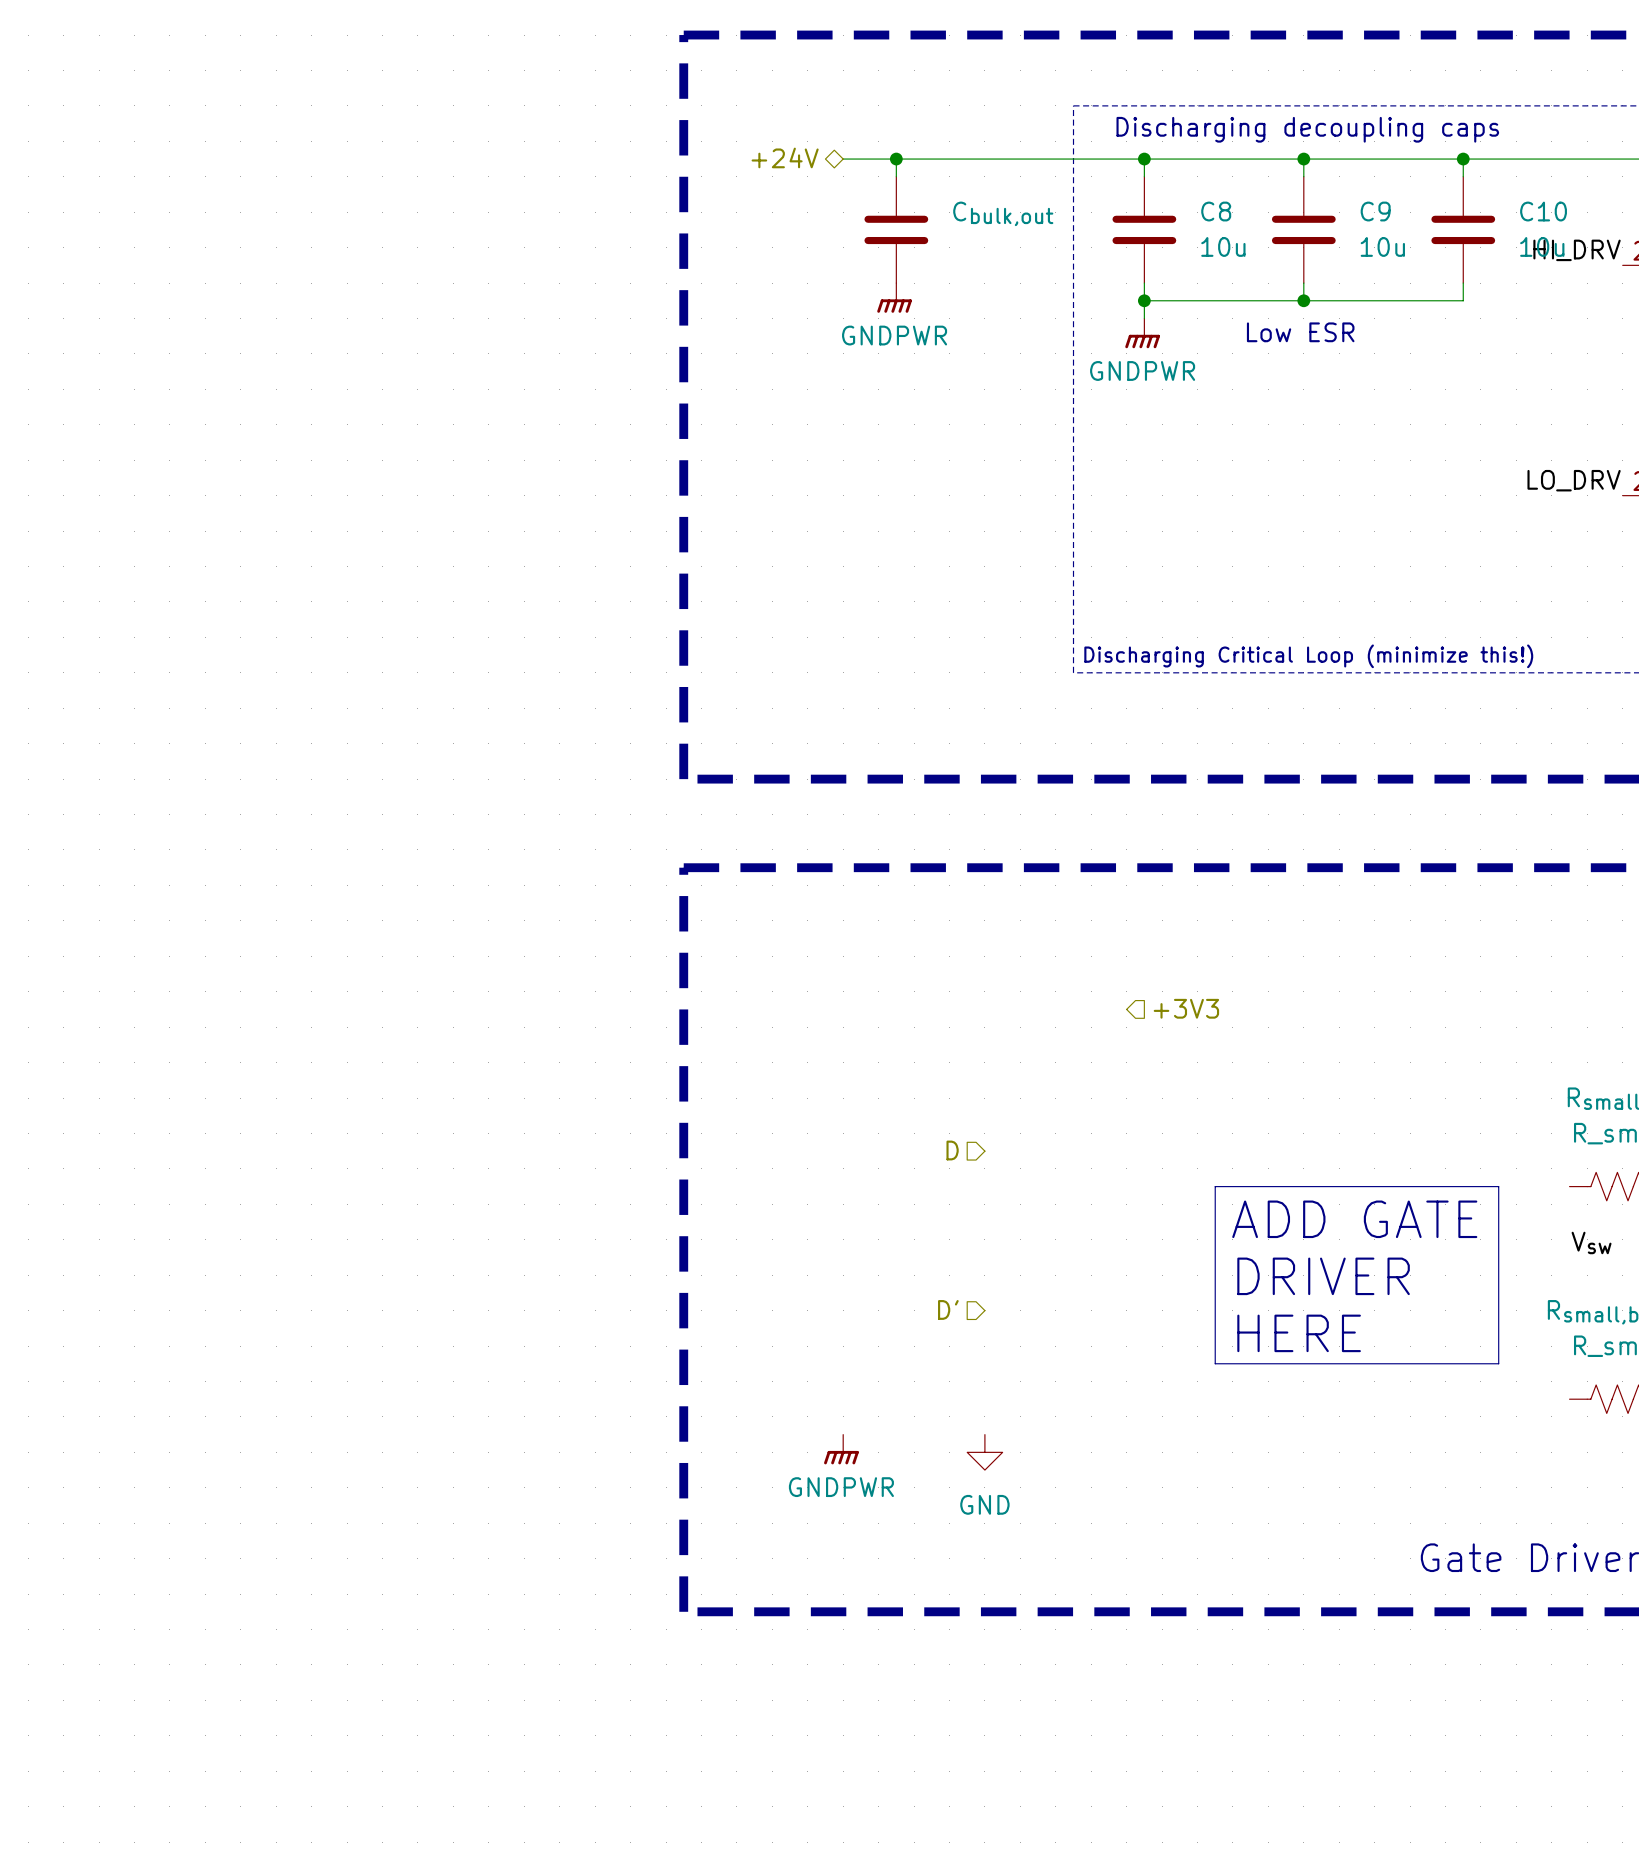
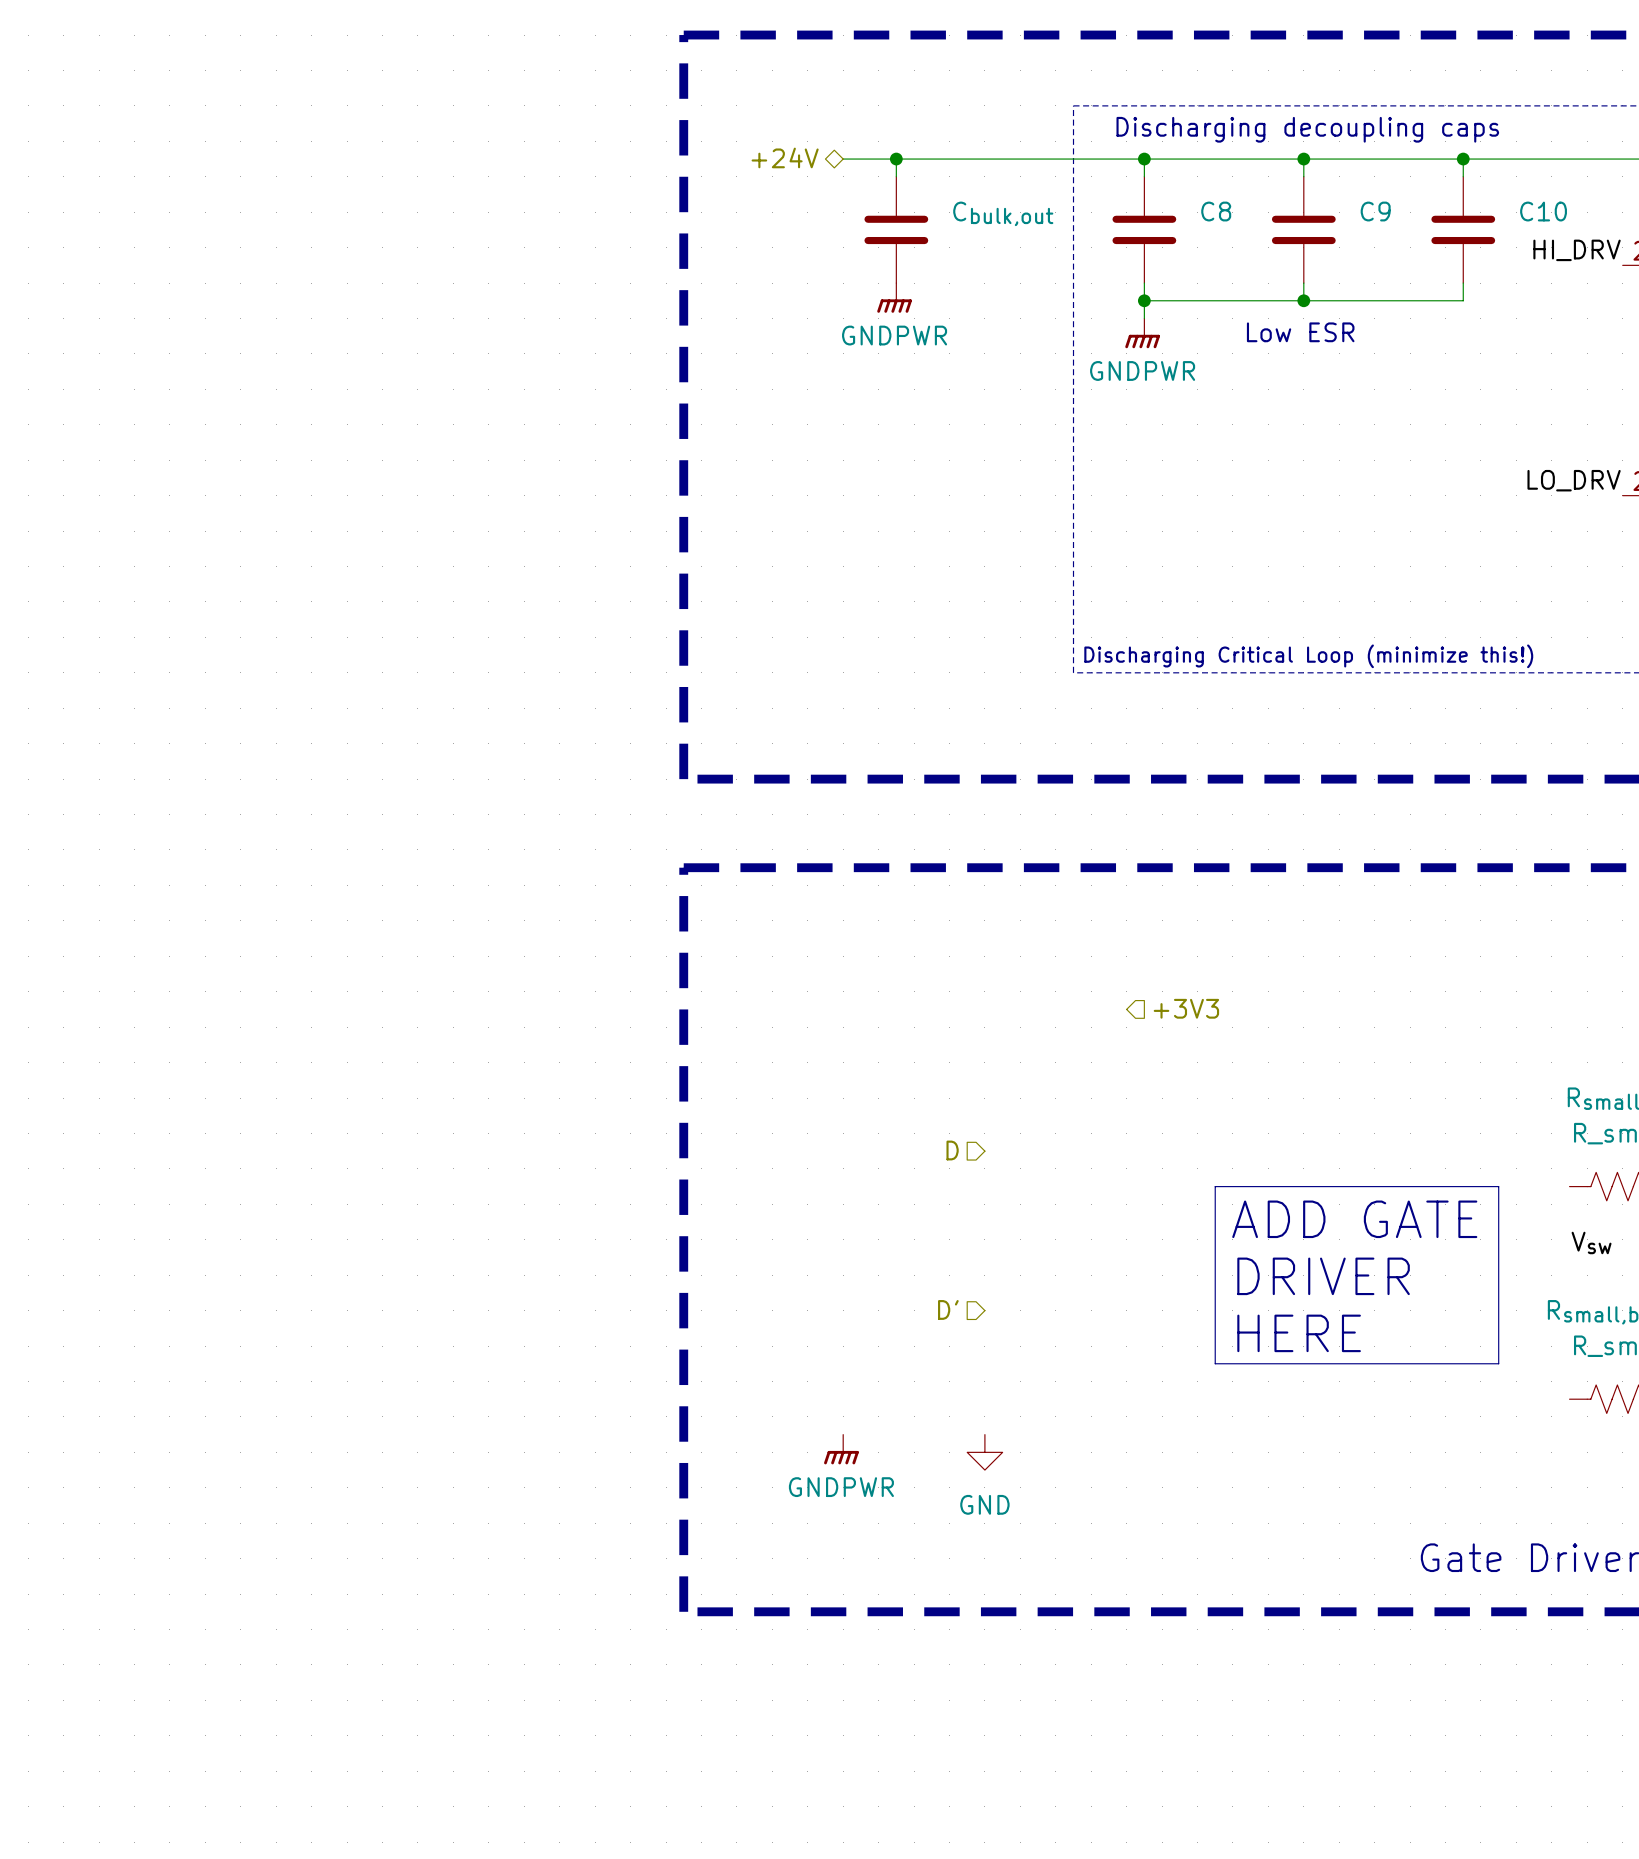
C8 value: 10u (1223, 246) -> none
C9 value: 10u (1382, 246) -> none
C10 value: 10u (1542, 246) -> none

